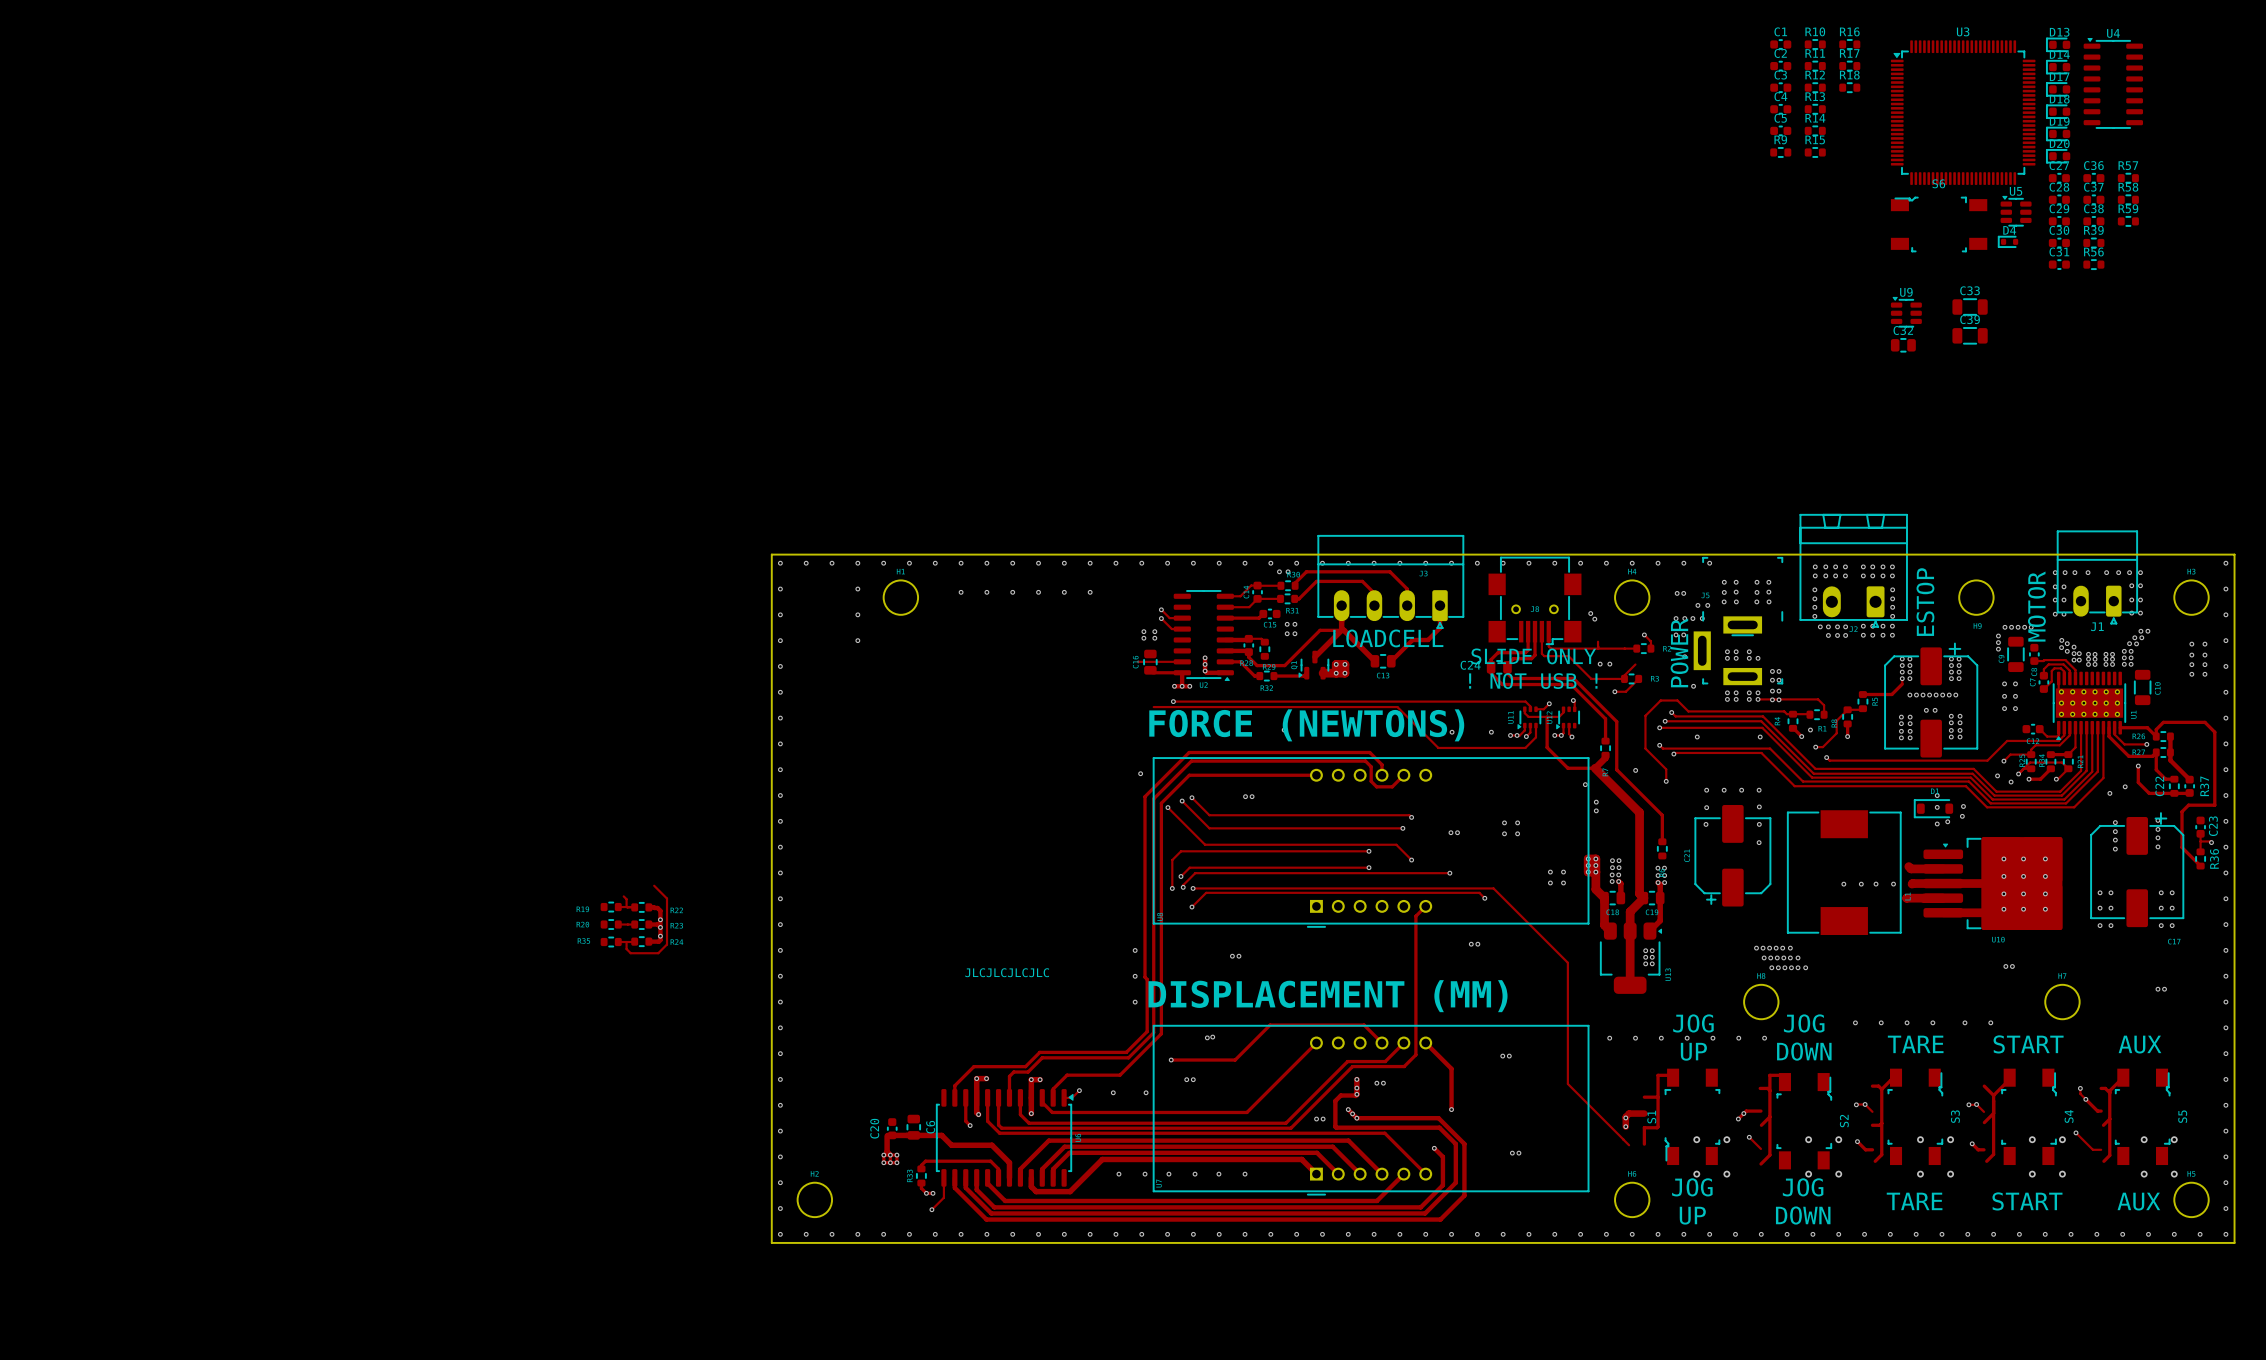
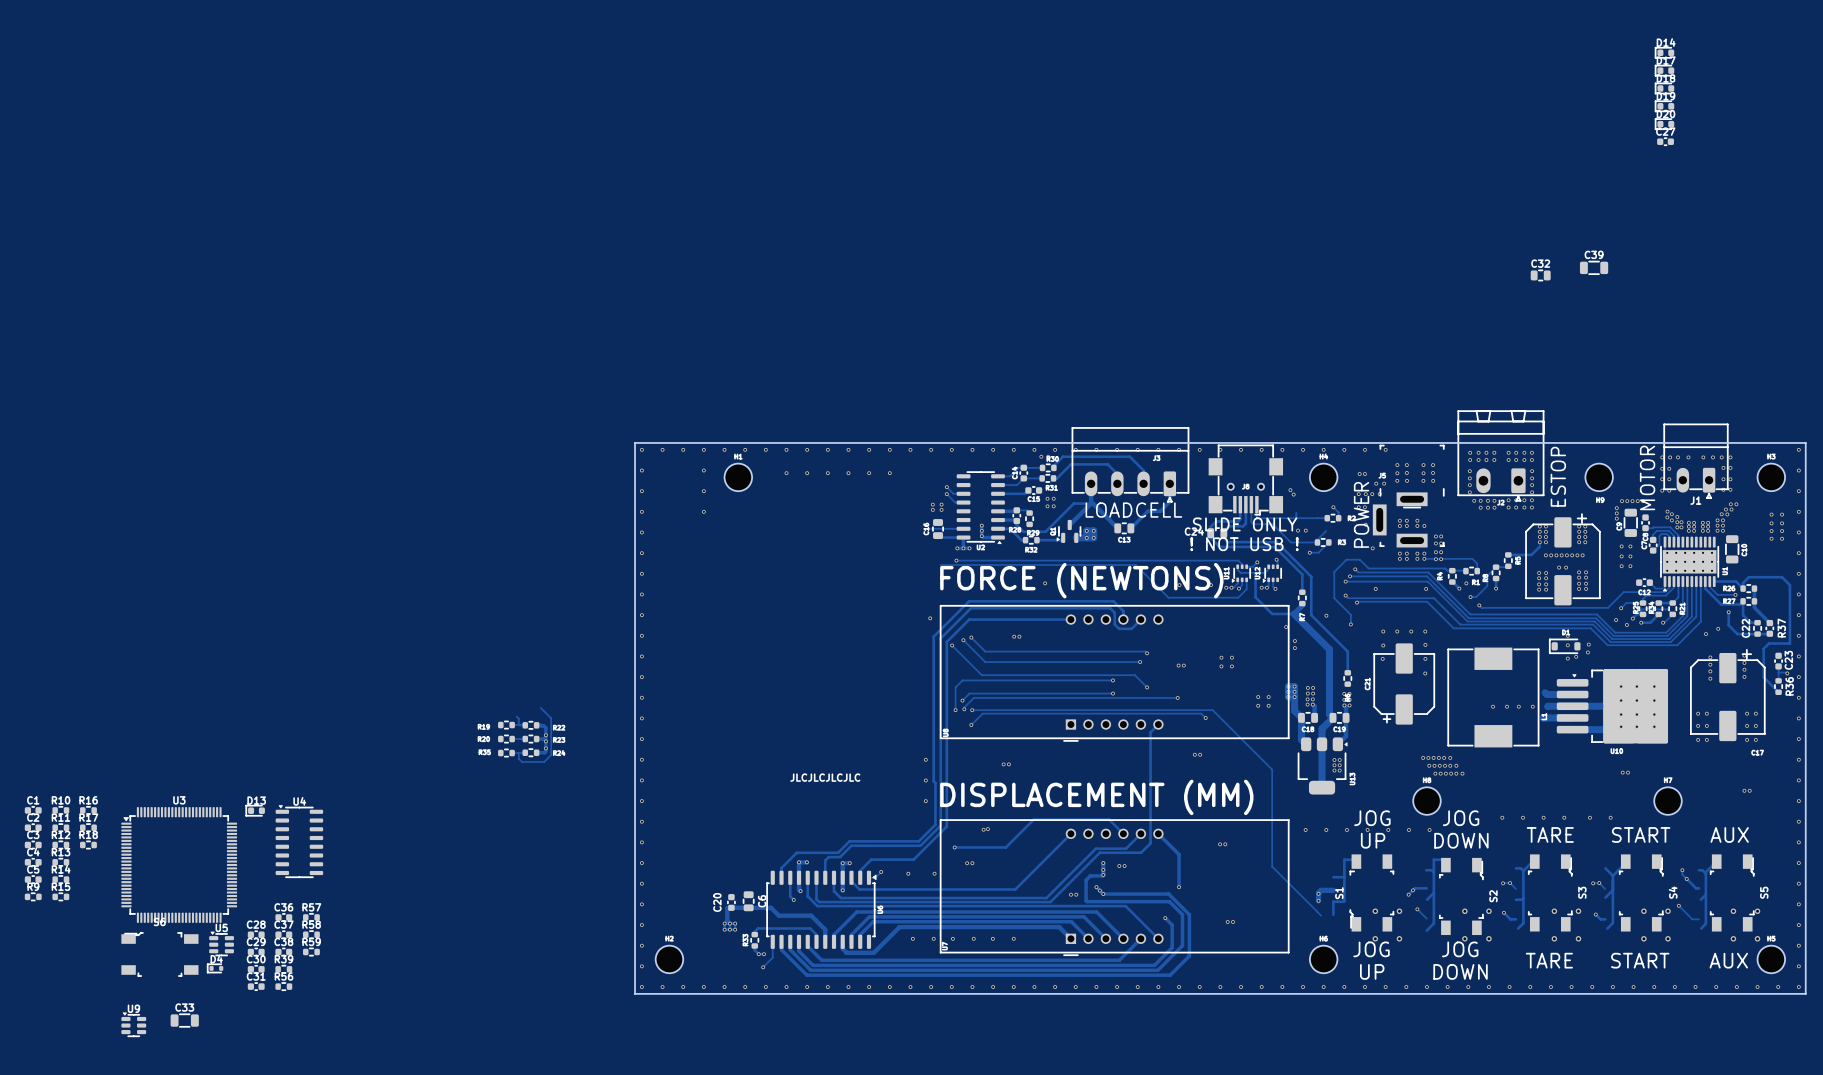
C1 position: (1780, 44) -> (33, 810)
R10 position: (1815, 44) -> (60, 810)
R16 position: (1849, 44) -> (88, 810)
D13 position: (2058, 44) -> (255, 810)
C2 position: (1780, 66) -> (33, 827)
R11 position: (1815, 66) -> (60, 827)
R17 position: (1849, 66) -> (88, 827)
U4 position: (2113, 83) -> (299, 841)
C3 position: (1780, 87) -> (33, 845)
R12 position: (1815, 87) -> (60, 845)
R18 position: (1849, 87) -> (88, 845)
C4 position: (1780, 109) -> (33, 862)
R13 position: (1815, 109) -> (60, 862)
U3 position: (1963, 112) -> (179, 864)
C5 position: (1780, 130) -> (33, 879)
R14 position: (1815, 130) -> (60, 879)
R9 position: (1780, 152) -> (33, 896)
R15 position: (1815, 152) -> (60, 896)
C36 position: (2093, 178) -> (283, 917)
R57 position: (2128, 178) -> (311, 917)
C28 position: (2059, 199) -> (256, 934)
C37 position: (2093, 199) -> (283, 934)
R58 position: (2128, 199) -> (311, 934)
U5 position: (2016, 211) -> (221, 943)
C29 position: (2059, 221) -> (256, 952)
C38 position: (2093, 221) -> (283, 952)
R59 position: (2128, 221) -> (311, 952)
S6 position: (1939, 224) -> (159, 954)
D4 position: (2008, 241) -> (215, 968)
C30 position: (2059, 242) -> (256, 969)
R39 position: (2093, 242) -> (283, 969)
C31 position: (2059, 264) -> (256, 986)
R56 position: (2093, 264) -> (283, 986)
C33 position: (1970, 307) -> (184, 1020)
U9 position: (1906, 312) -> (133, 1024)

